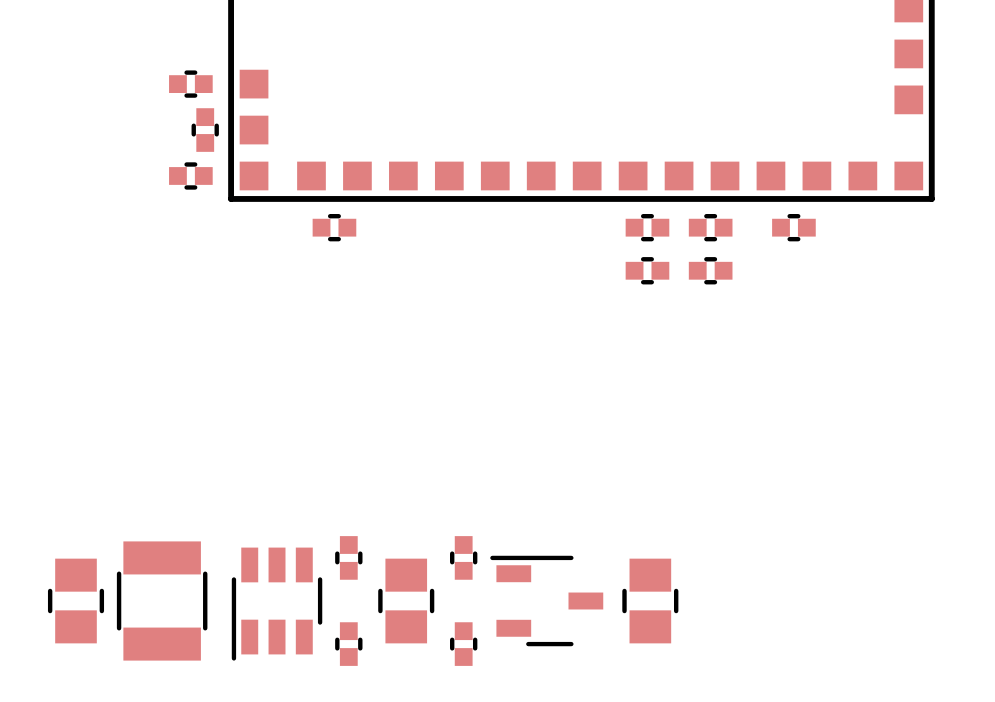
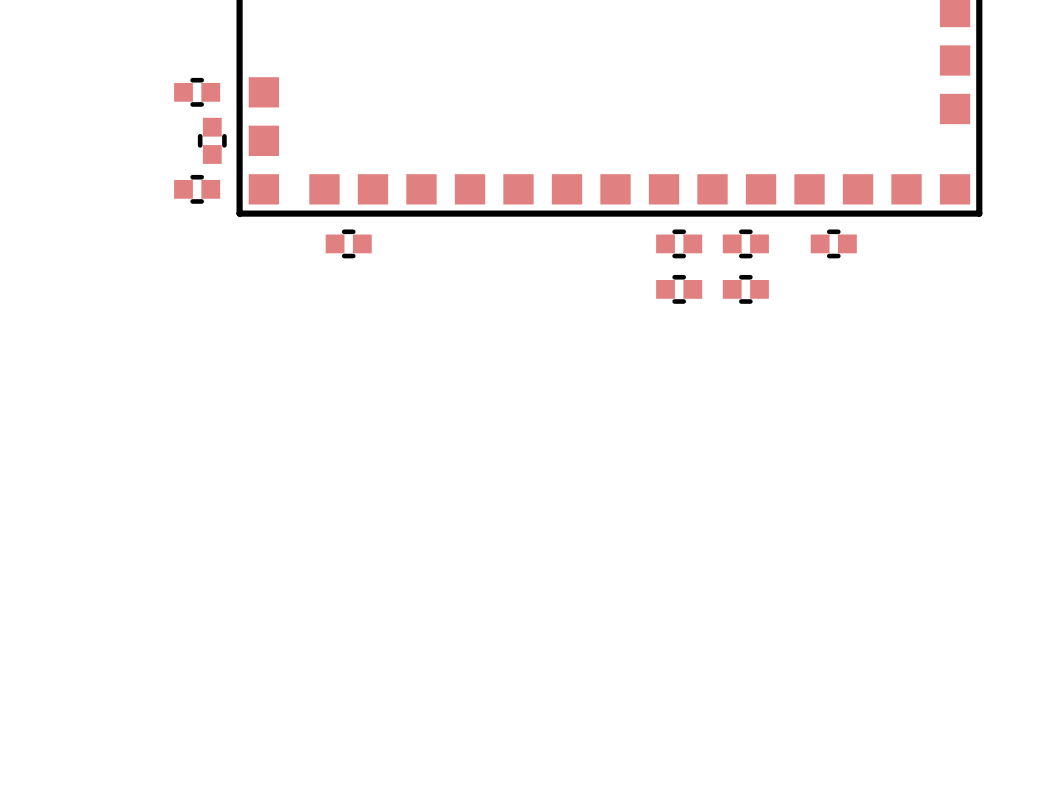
part: (348, 557) -> none
part: (463, 557) -> none
part: (76, 601) -> none
part: (162, 601) -> none
part: (406, 601) -> none
part: (546, 601) -> none
part: (650, 601) -> none
part: (277, 604) -> none
part: (348, 644) -> none
part: (463, 644) -> none

